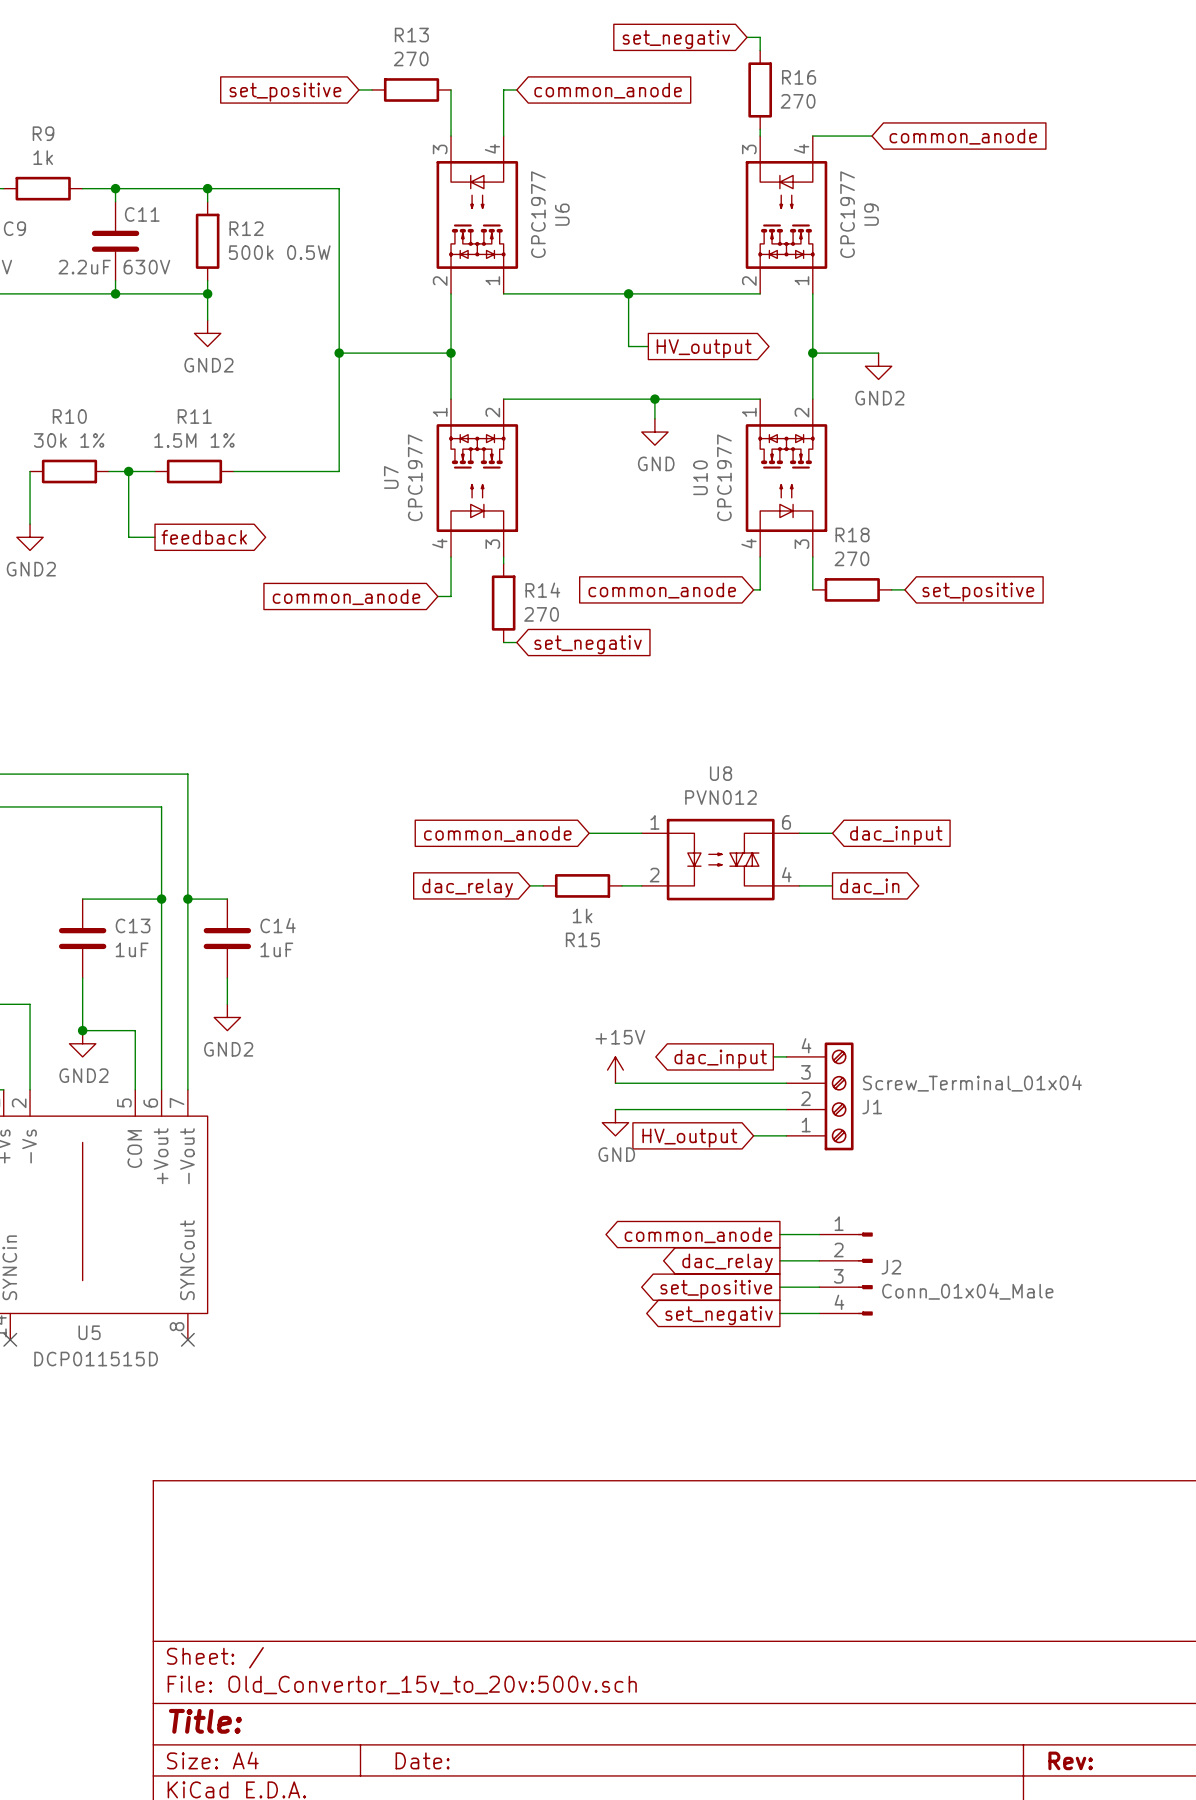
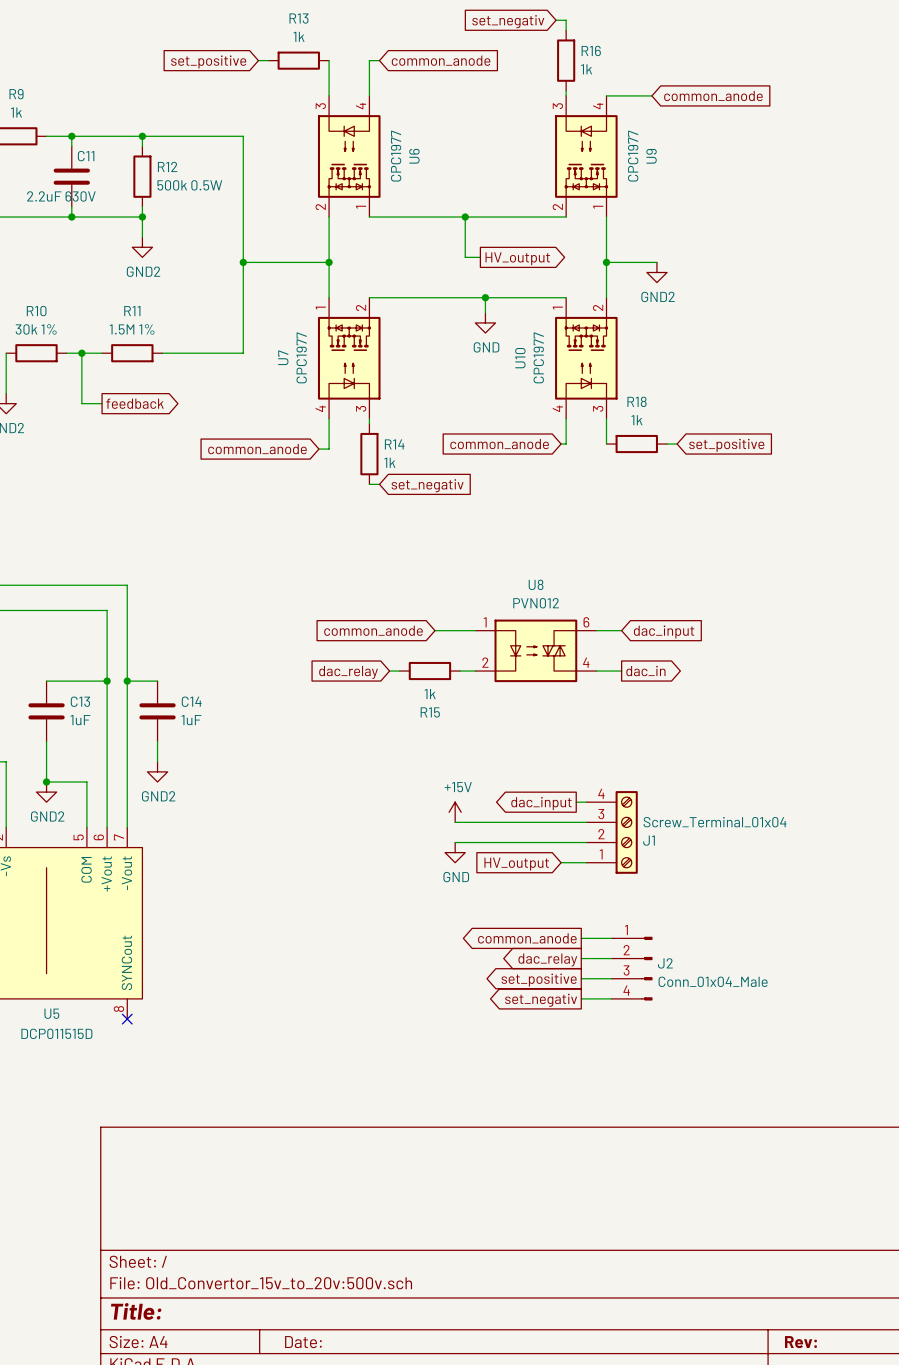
R13 value: 270 (411, 58) -> 1k (298, 36)
R16 value: 270 (798, 101) -> 1k (586, 69)
R18 value: 270 (851, 558) -> 1k (636, 420)
R14 value: 270 (541, 614) -> 1k (389, 462)

